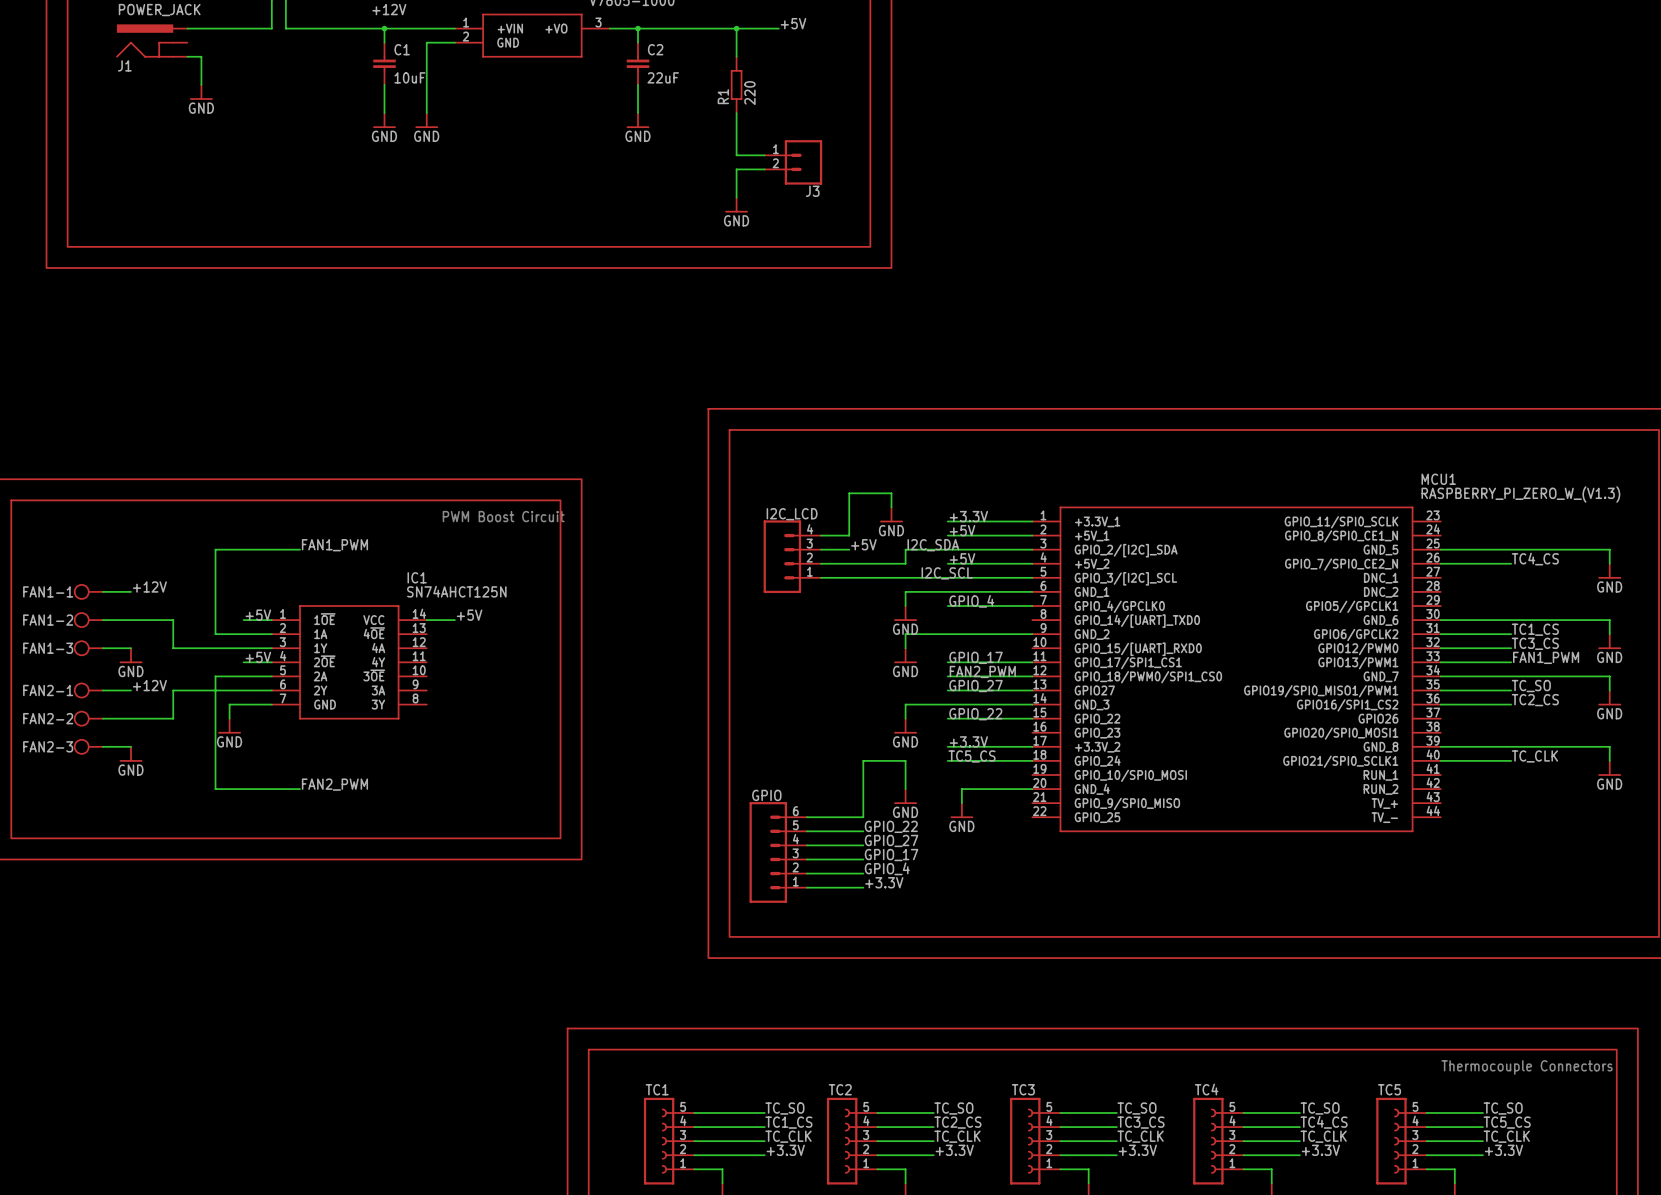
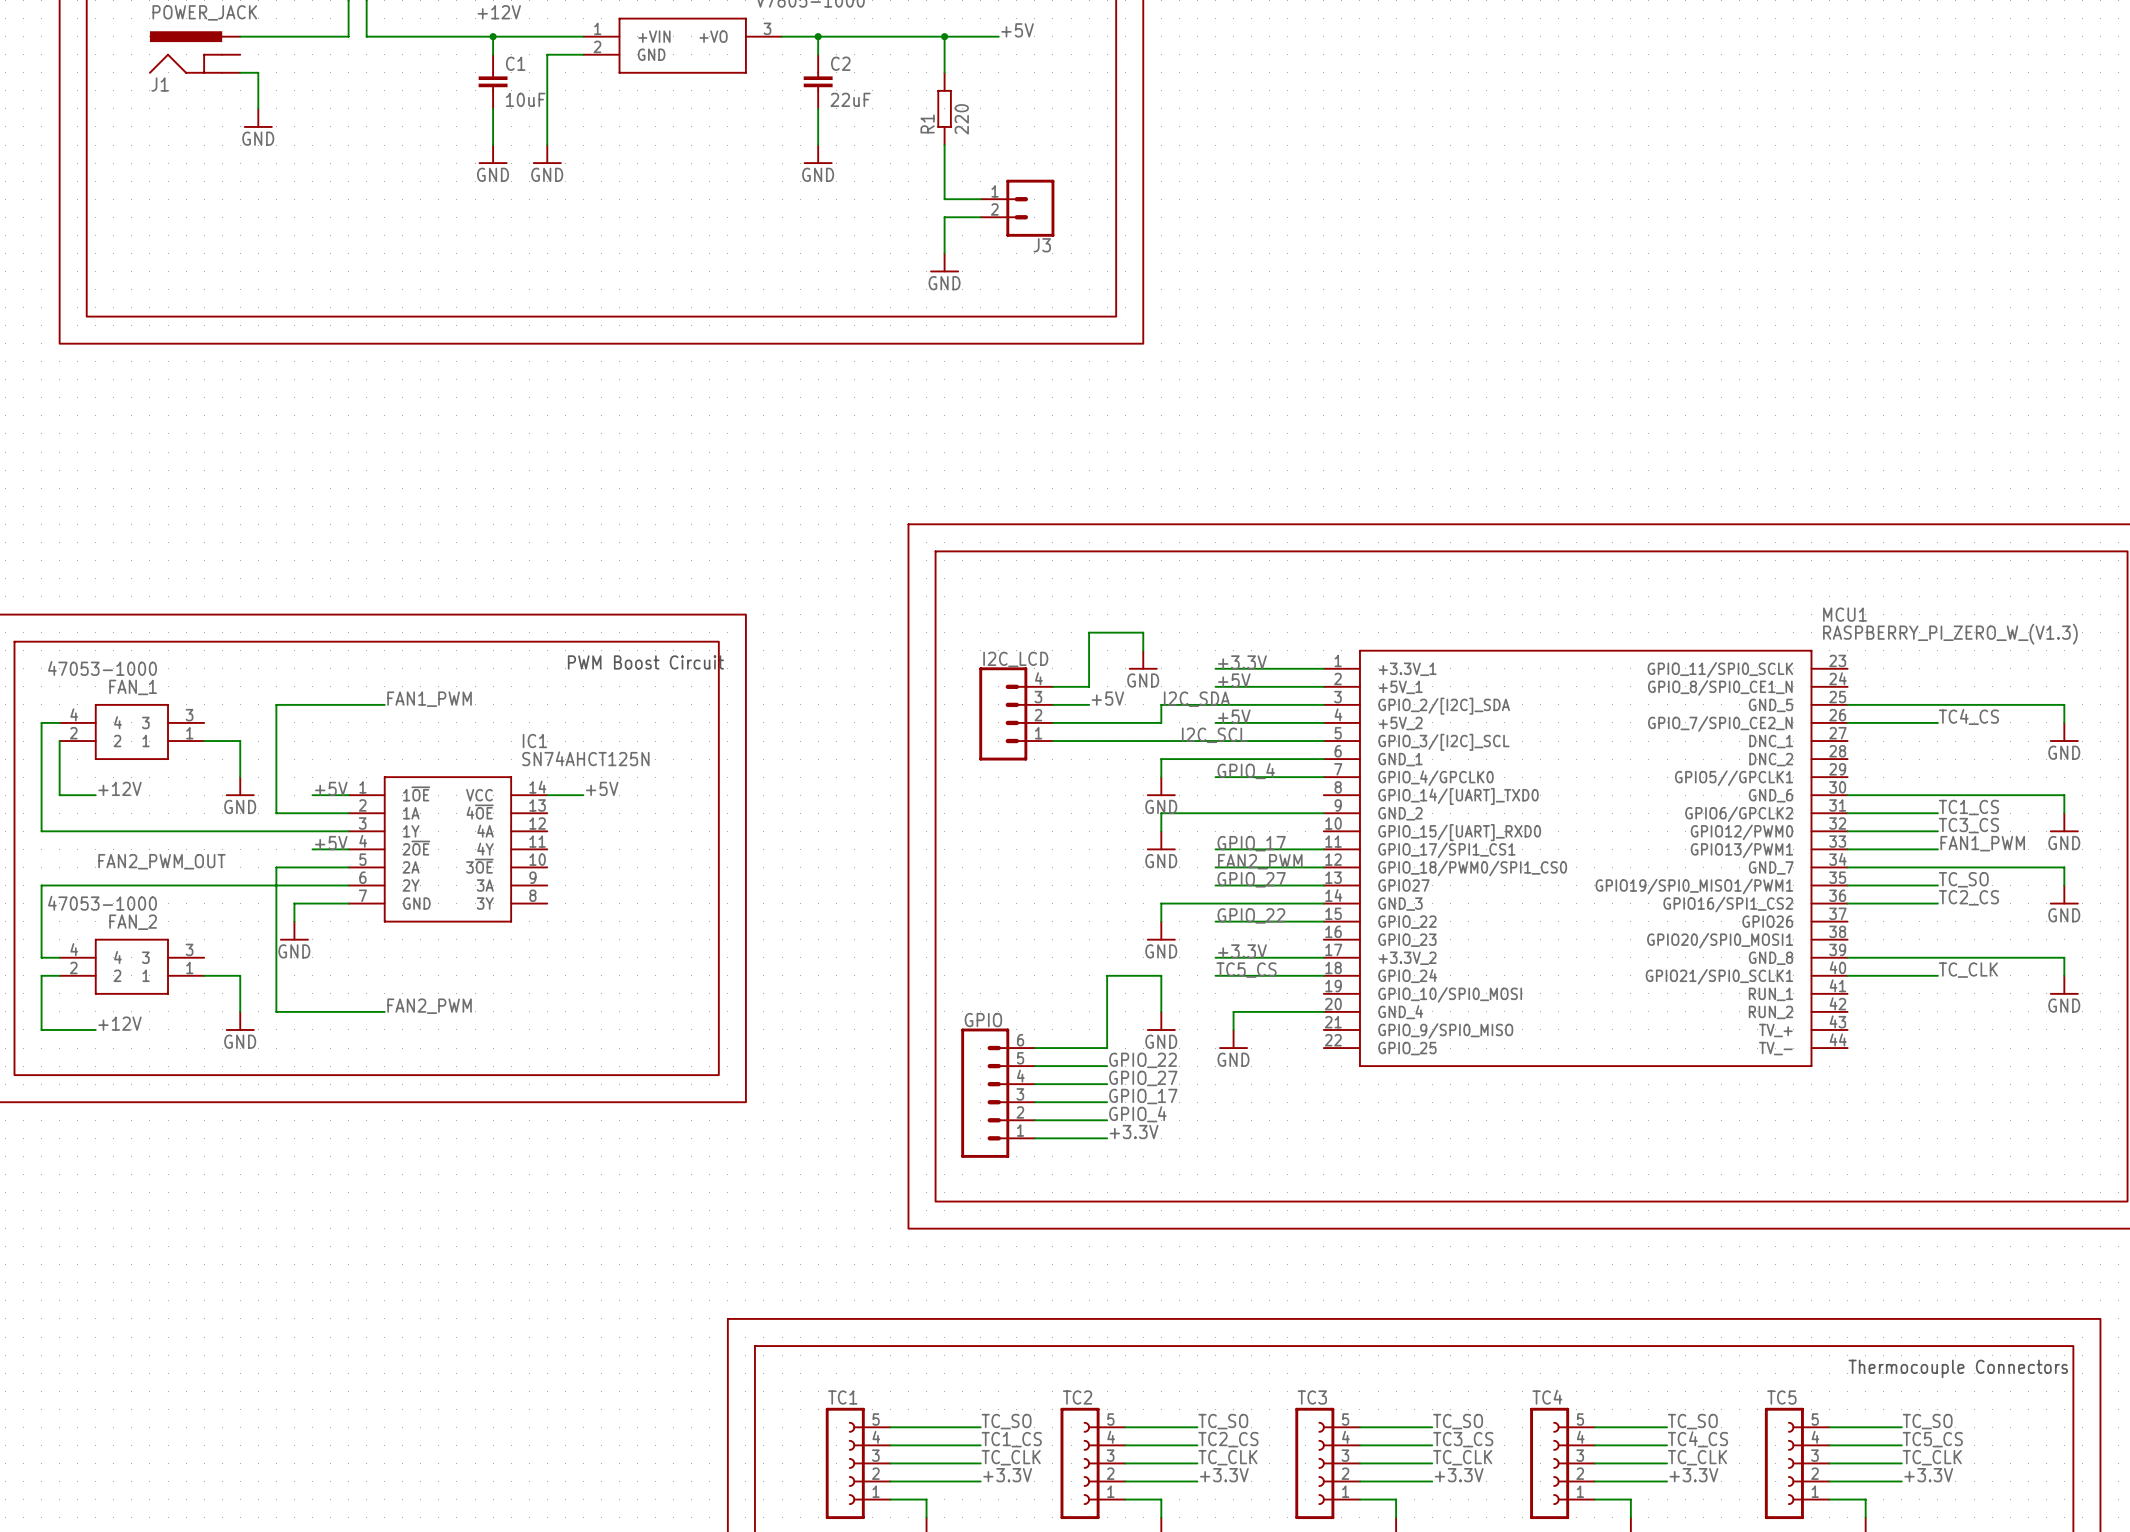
wire: none -> (59, 722) (41, 722) (41, 831) (131, 831)
FAN_1: none -> 47053-1000 (131, 731)
wire: none -> (59, 741) (59, 795) (95, 795)
wire: none -> (204, 741) (240, 741) (240, 777)
label: +12V (149, 586) -> none
FAN1-1: (88, 591) -> none
label: none -> +12V (119, 788)
FAN1-2: (88, 620) -> none
wire: (102, 620) (173, 620) (173, 648) -> (168, 831) (222, 831)
FAN1-3: (88, 648) -> none
power symbol position: GND (131, 655) -> GND (240, 786)
label: none -> FAN2_PWM_OUT (161, 861)
label: +12V (149, 685) -> none
FAN2-1: (88, 690) -> none
wire: none -> (131, 885) (41, 885) (41, 957) (59, 957)
wire: (173, 690) (173, 718) (102, 718) -> (222, 885) (168, 885)
FAN2-2: (88, 718) -> none
FAN2-3: (88, 746) -> none
wire: (102, 746) (131, 746) -> none
FAN_2: none -> 47053-1000 (131, 966)
power symbol position: GND (131, 754) -> GND (240, 1021)
wire: none -> (59, 975) (41, 975) (41, 1029) (95, 1029)
wire: none -> (204, 975) (240, 975) (240, 1011)
label: none -> +12V (119, 1023)

